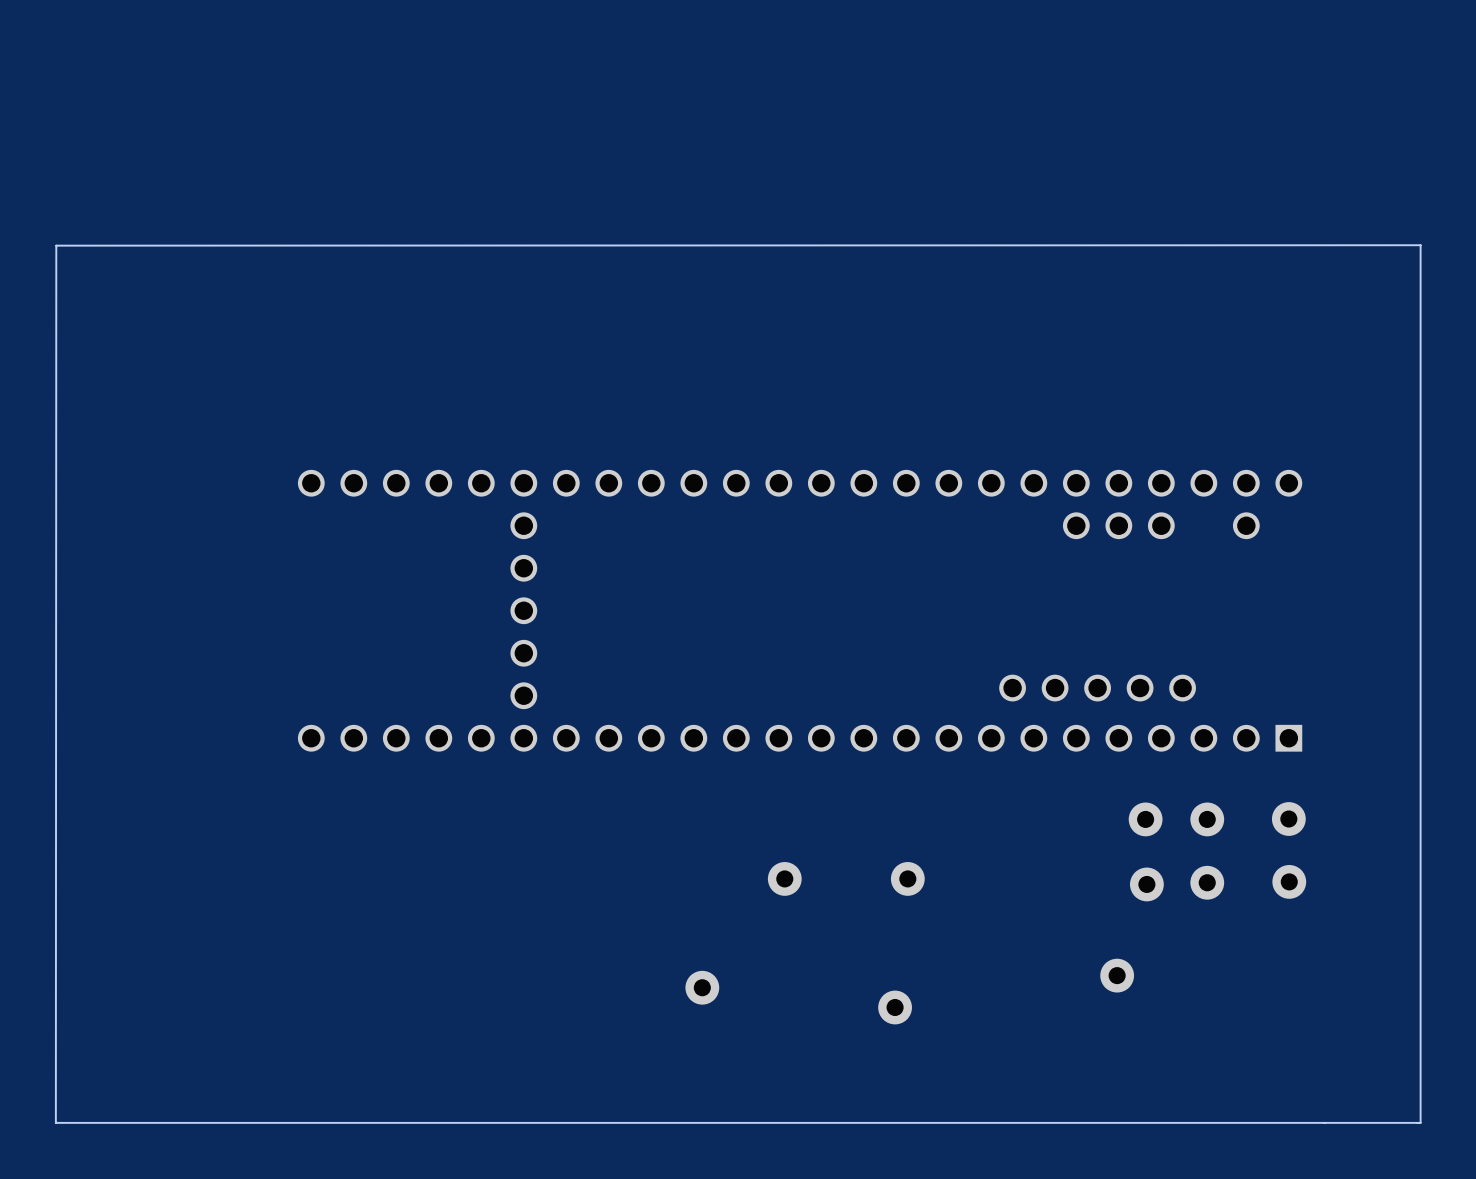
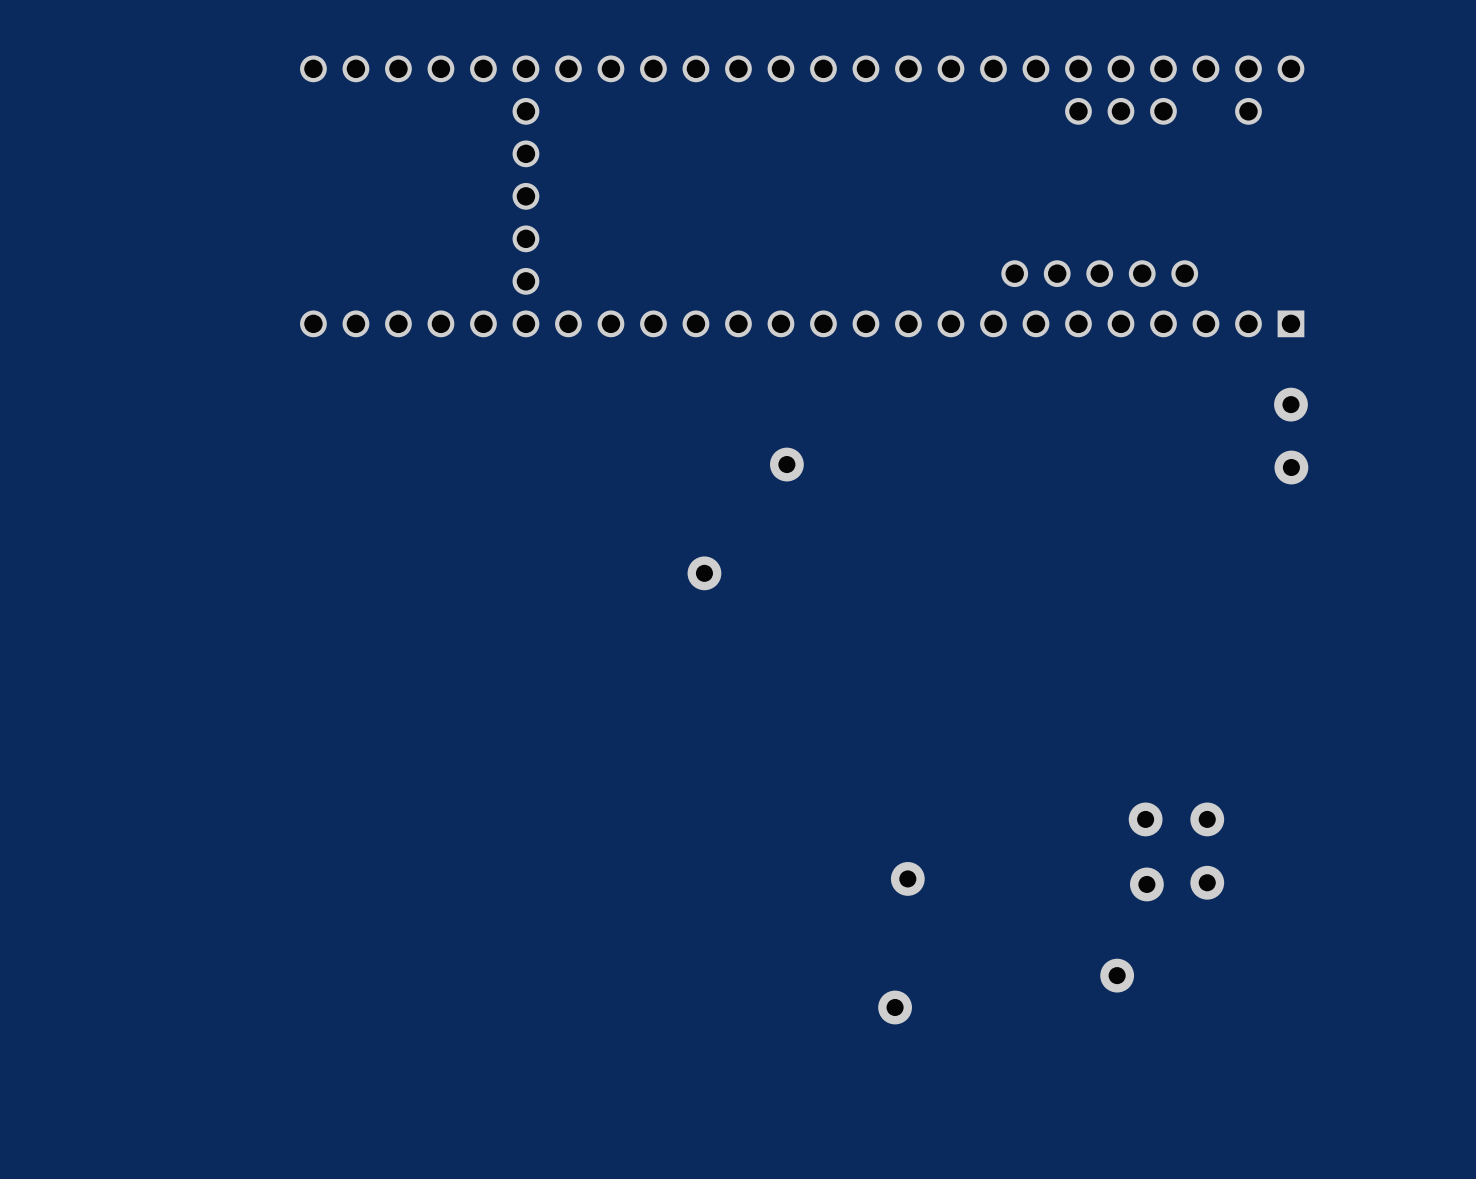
board edge: (1420, 245) (1420, 1122) (55, 1122) (56, 245) (1420, 245) -> none
part: none -> (1290, 404)
part: none -> (786, 464)
part: none -> (1291, 467)
part: none -> (704, 573)
part position: (800, 610) -> (802, 196)
part: (1288, 819) -> none
part: (784, 878) -> none
part: (1289, 881) -> none
part: (702, 987) -> none

